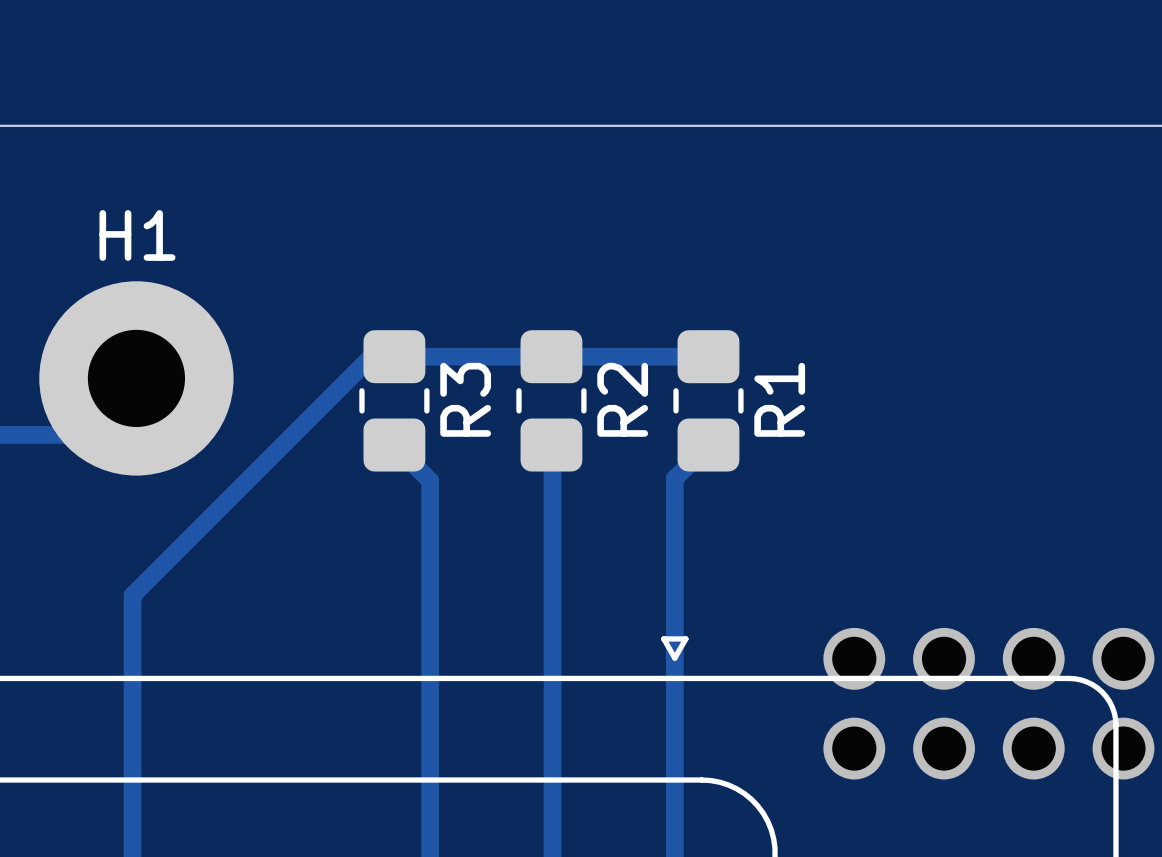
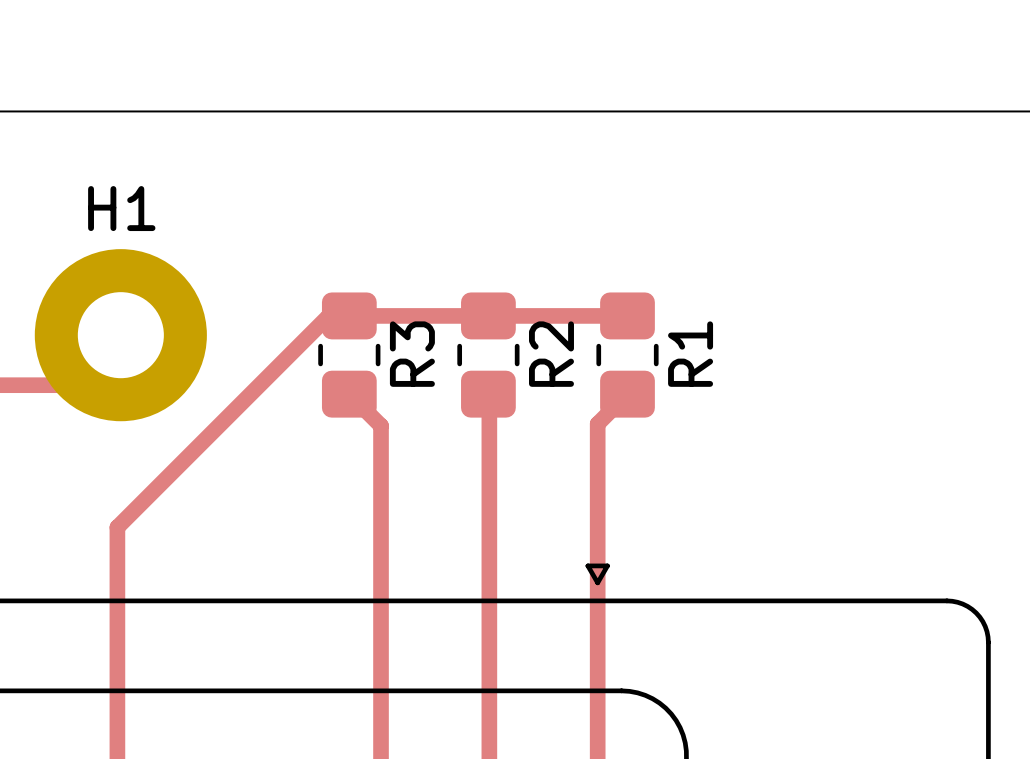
via: (854, 658) -> none
via: (944, 658) -> none
via: (1033, 658) -> none
via: (1123, 658) -> none
via: (854, 748) -> none
via: (944, 748) -> none
via: (1033, 748) -> none
via: (1123, 748) -> none

